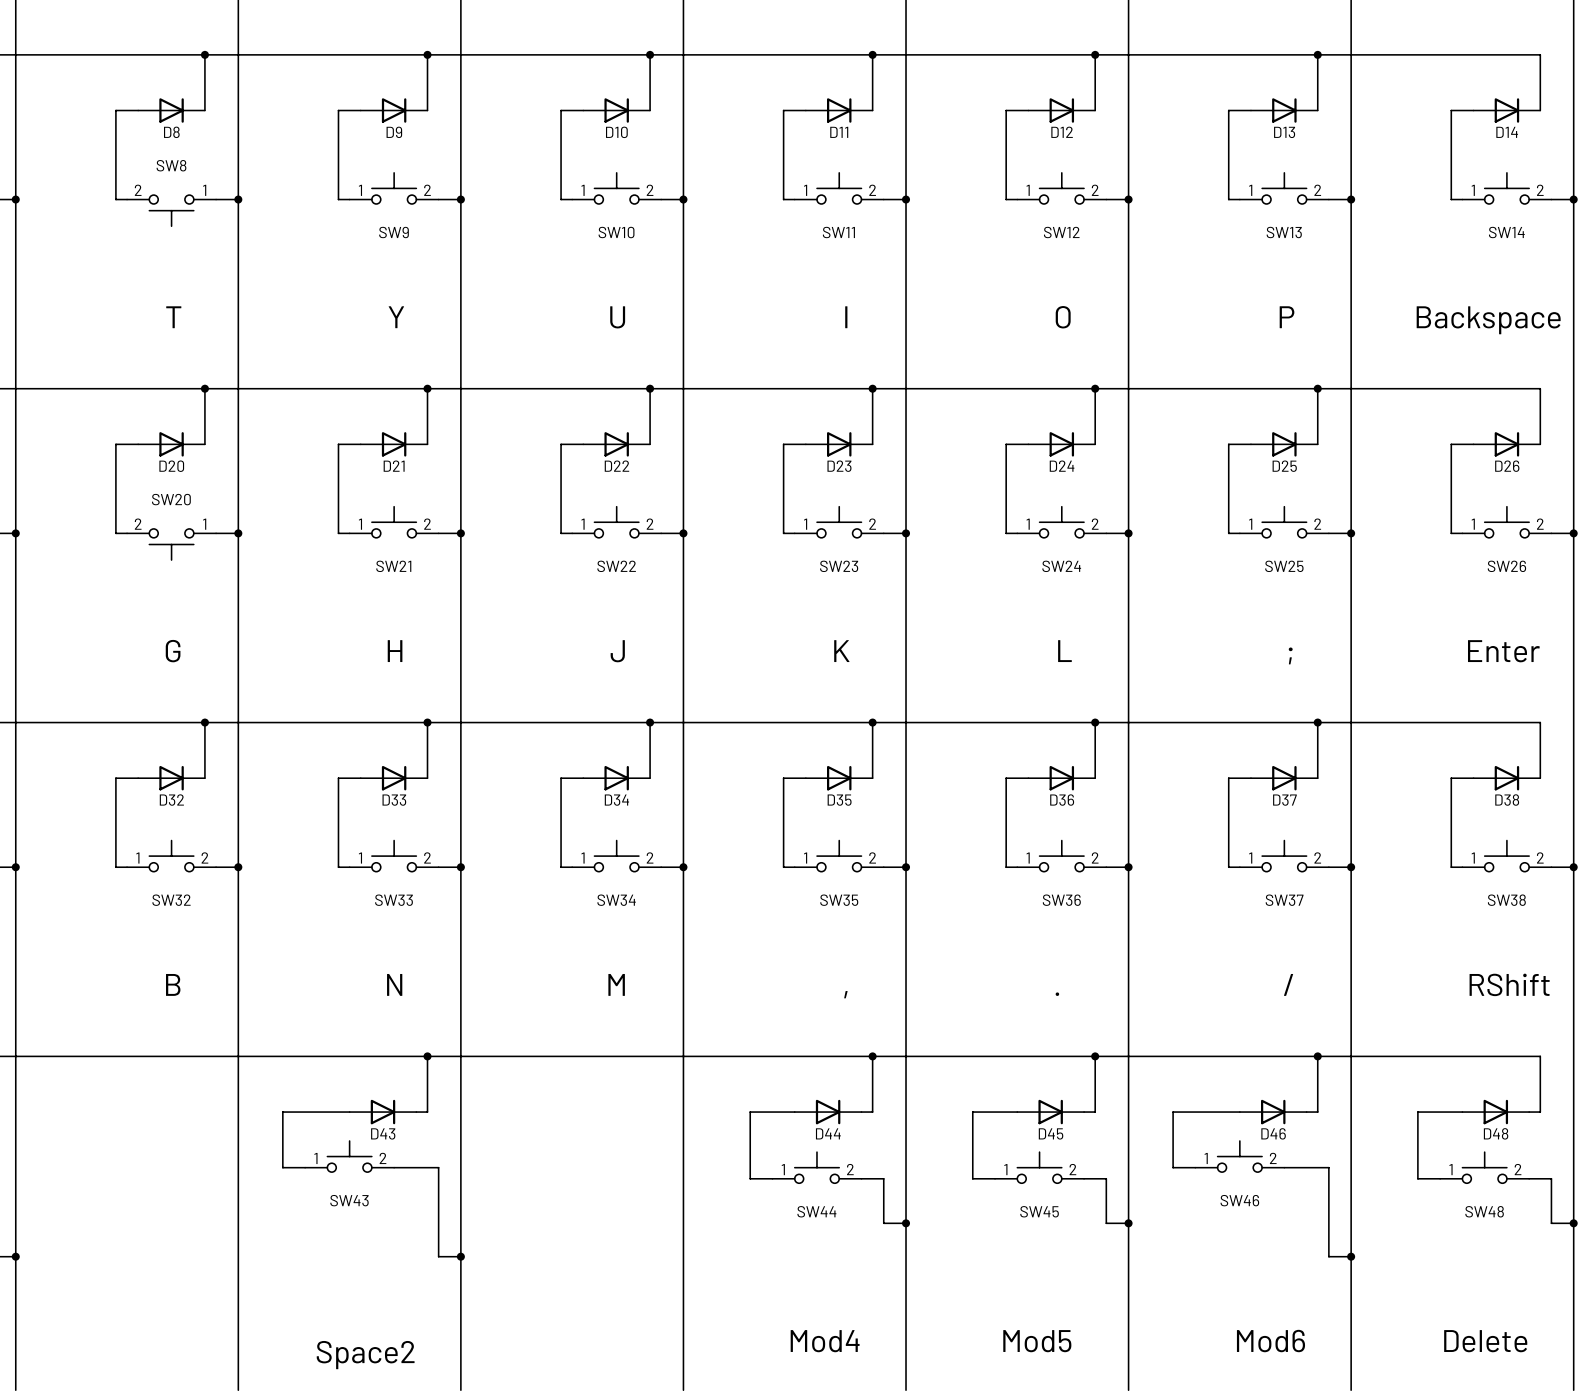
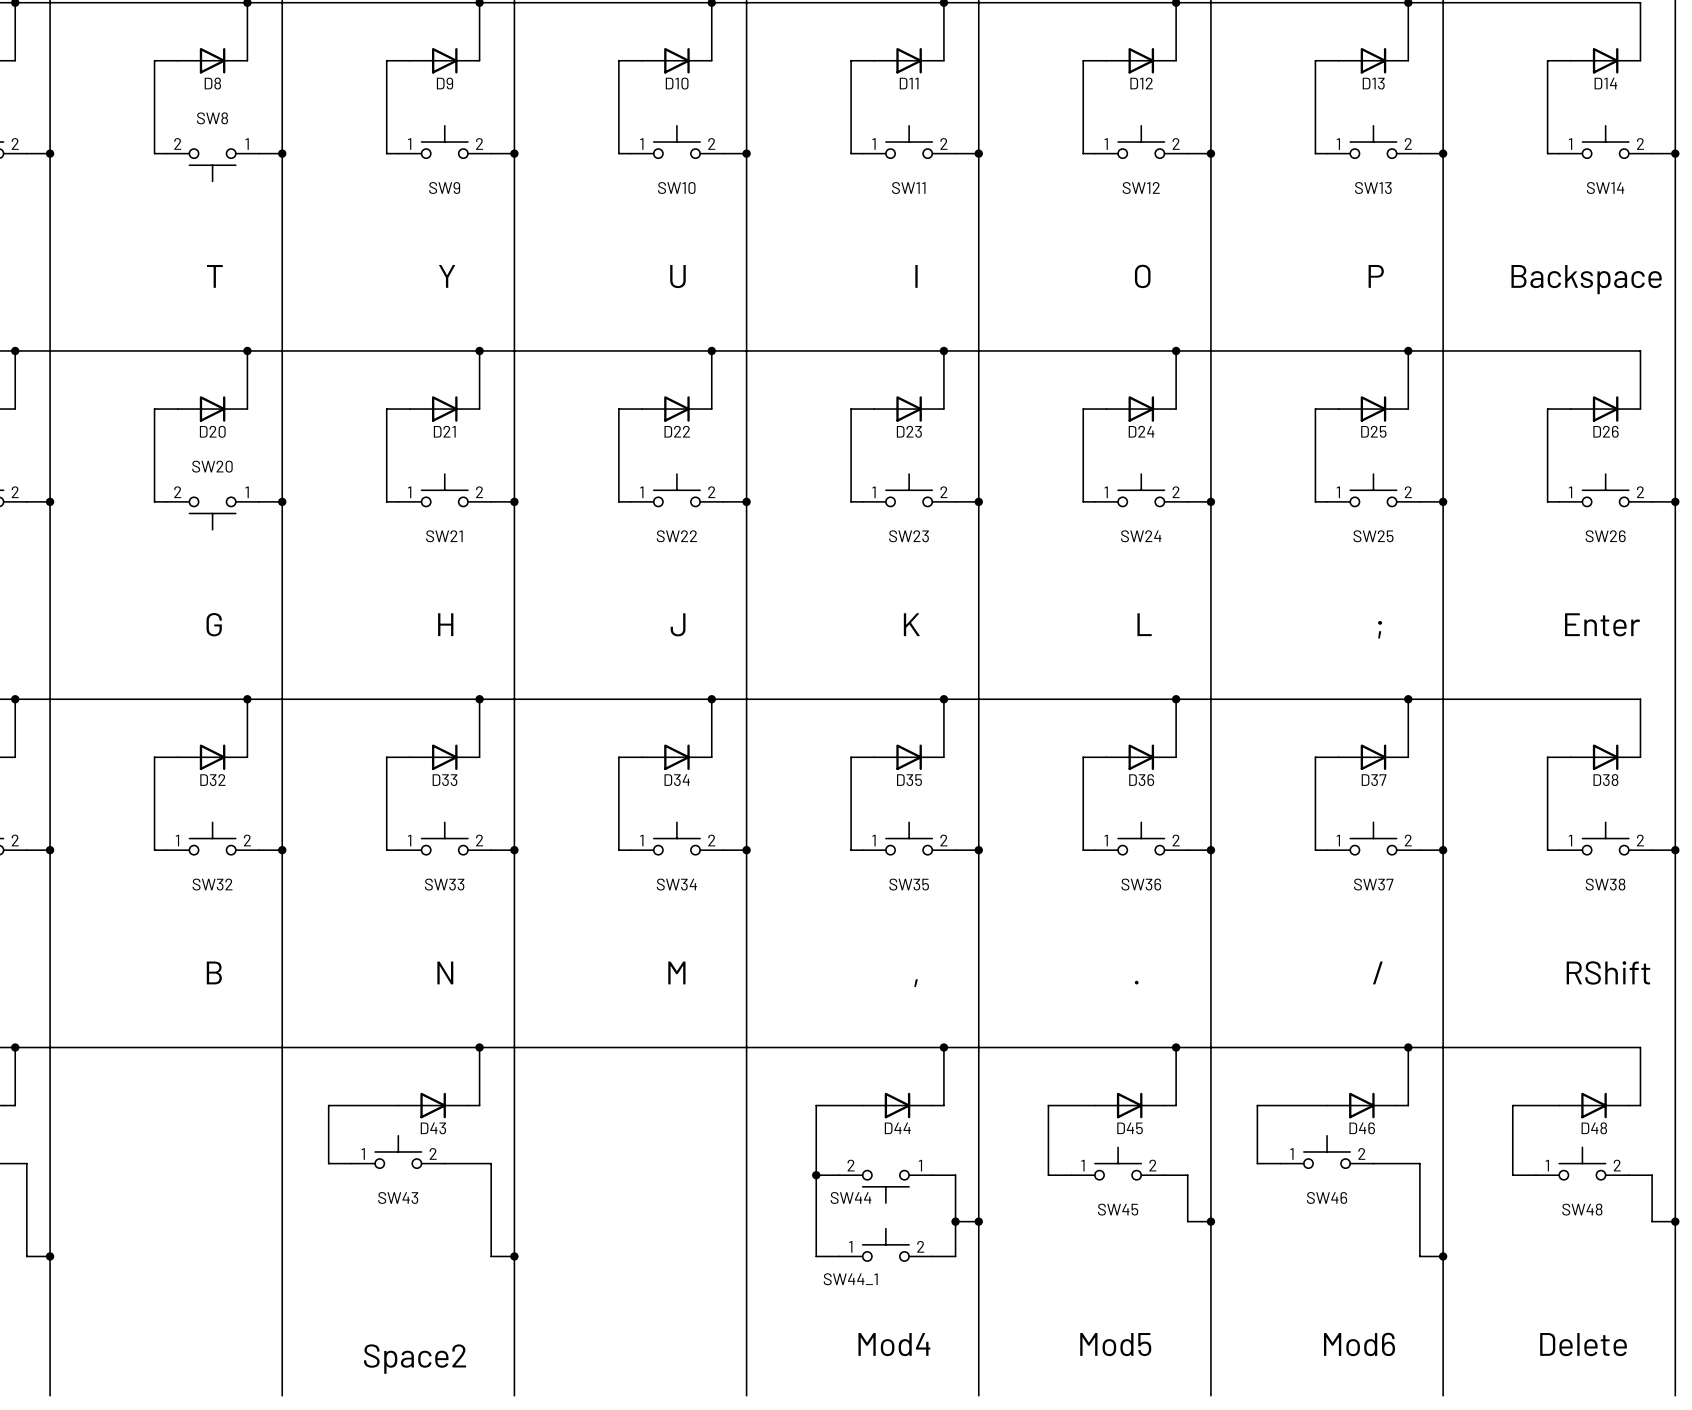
SW44 rotation: 0° (816, 1167) -> 180° (885, 1186)
wire: none -> (816, 1175) (816, 1256) (839, 1256)
junction: none -> (816, 1175)
SW44 name position: SW44 (816, 1211) -> SW44 (850, 1197)
wire: none -> (955, 1221) (955, 1256) (932, 1256)
junction: none -> (955, 1221)
SW44_1: none -> (885, 1244)

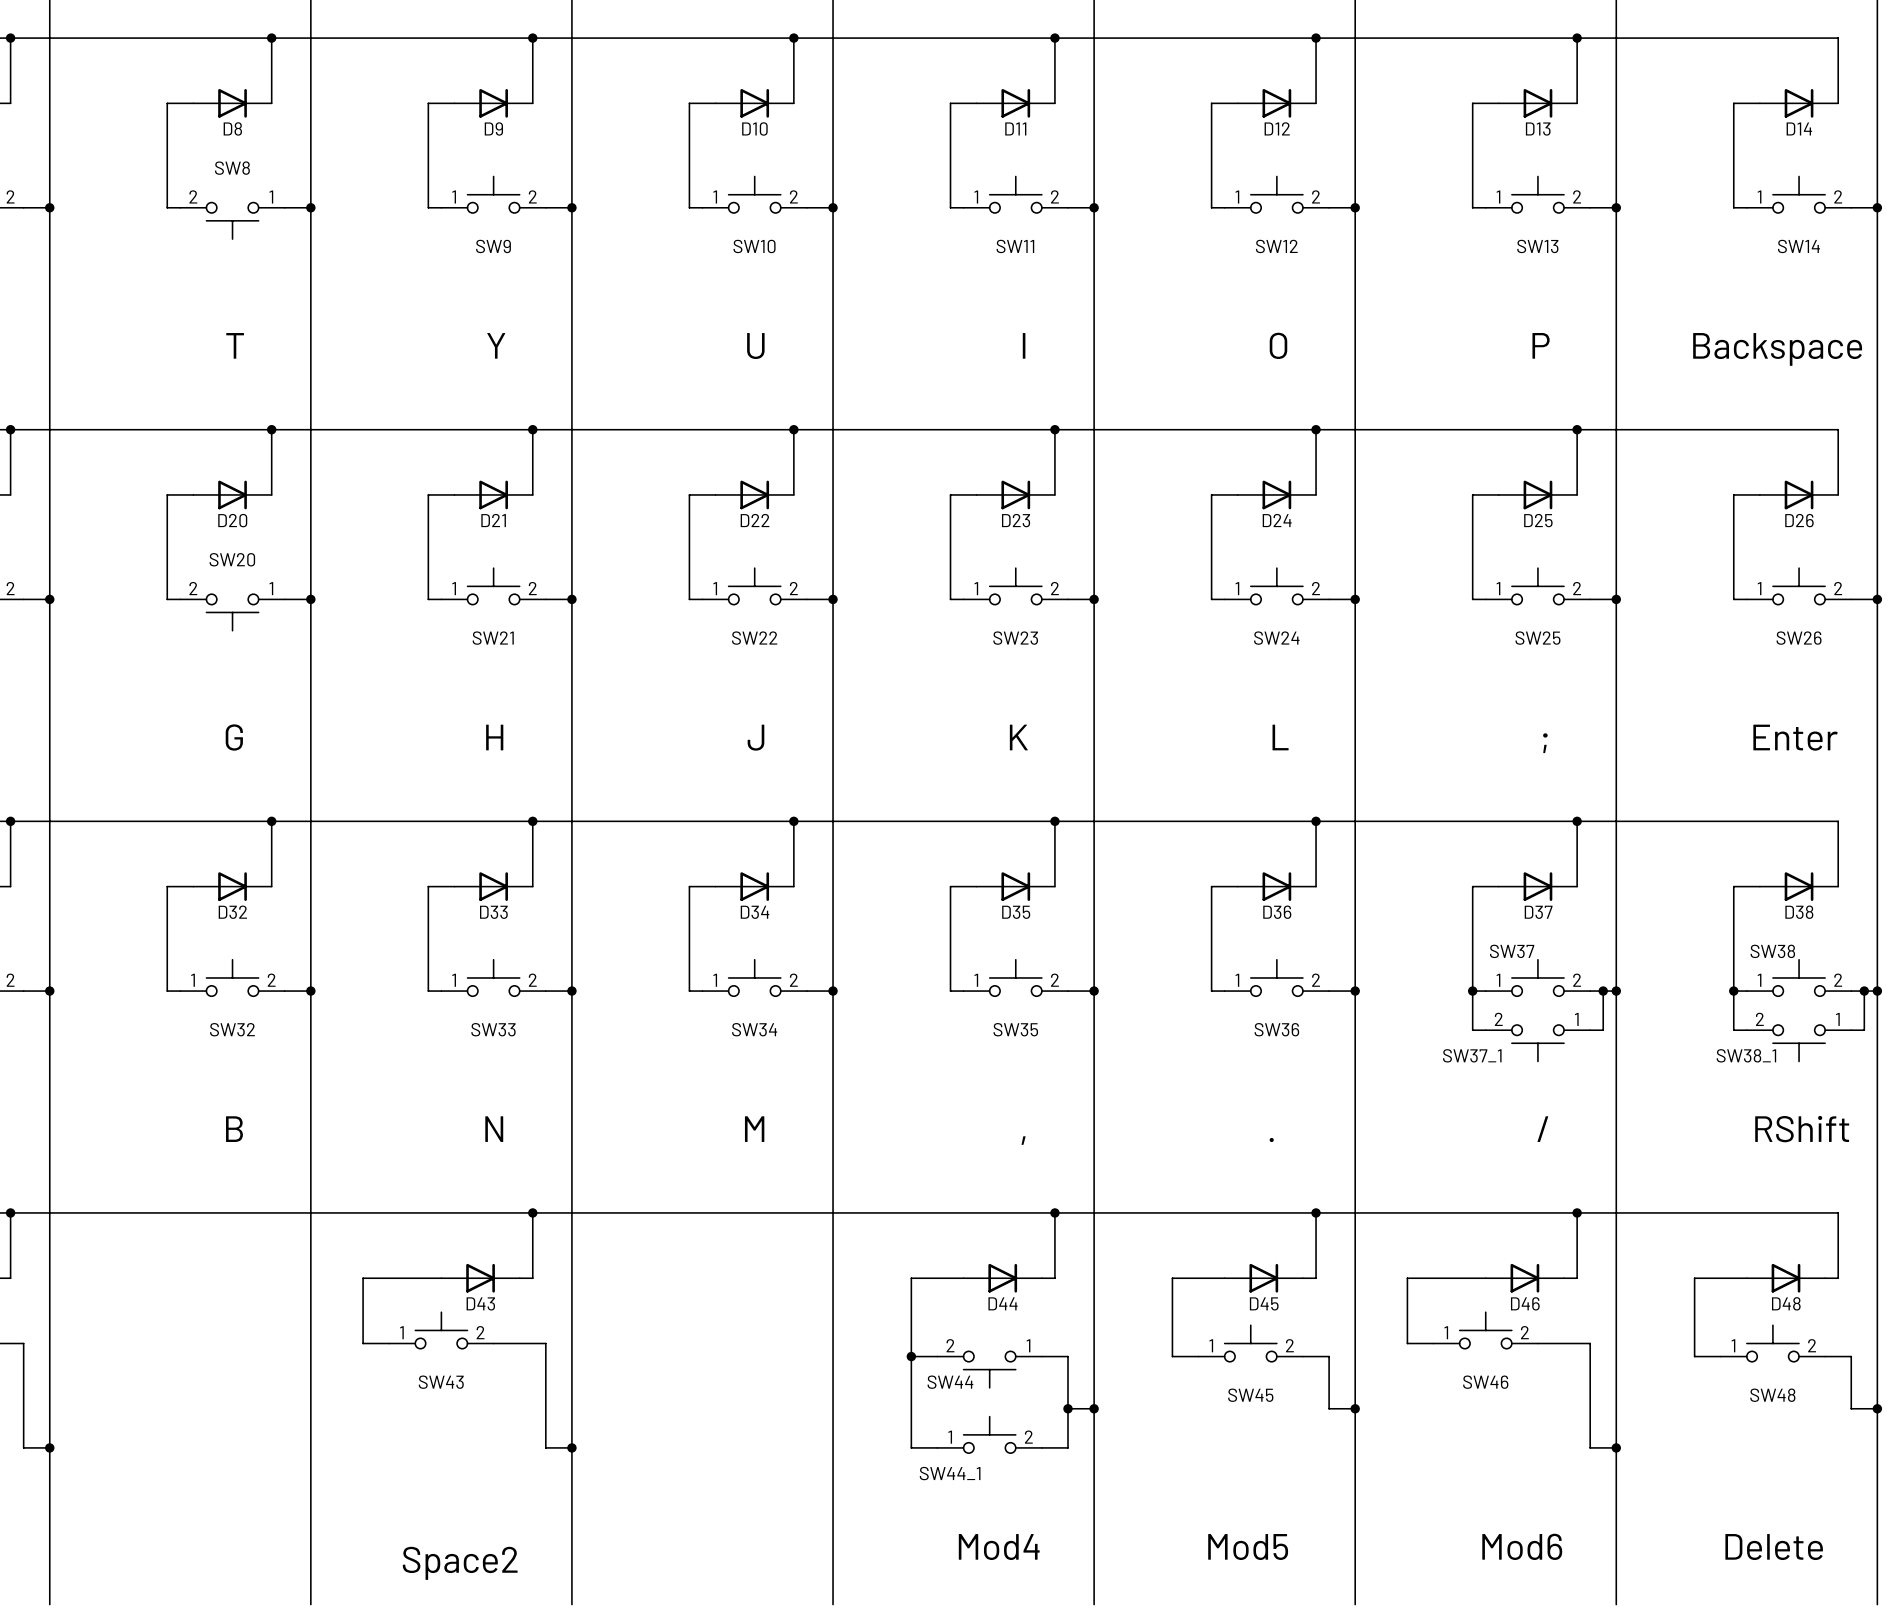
wire: none -> (1472, 991) (1472, 1030) (1485, 1030)
junction: none -> (1472, 991)
wire: none -> (1603, 991) (1603, 1030) (1590, 1030)
junction: none -> (1603, 991)
wire: none -> (1733, 991) (1733, 1030) (1746, 1030)
junction: none -> (1733, 991)
wire: none -> (1864, 991) (1864, 1030) (1851, 1030)
junction: none -> (1864, 991)
SW37 name position: SW37 (1373, 884) -> SW37 (1512, 951)
SW38 name position: SW38 (1605, 884) -> SW38 (1772, 951)
SW37_1: none -> (1537, 1043)
SW38_1: none -> (1799, 1043)

